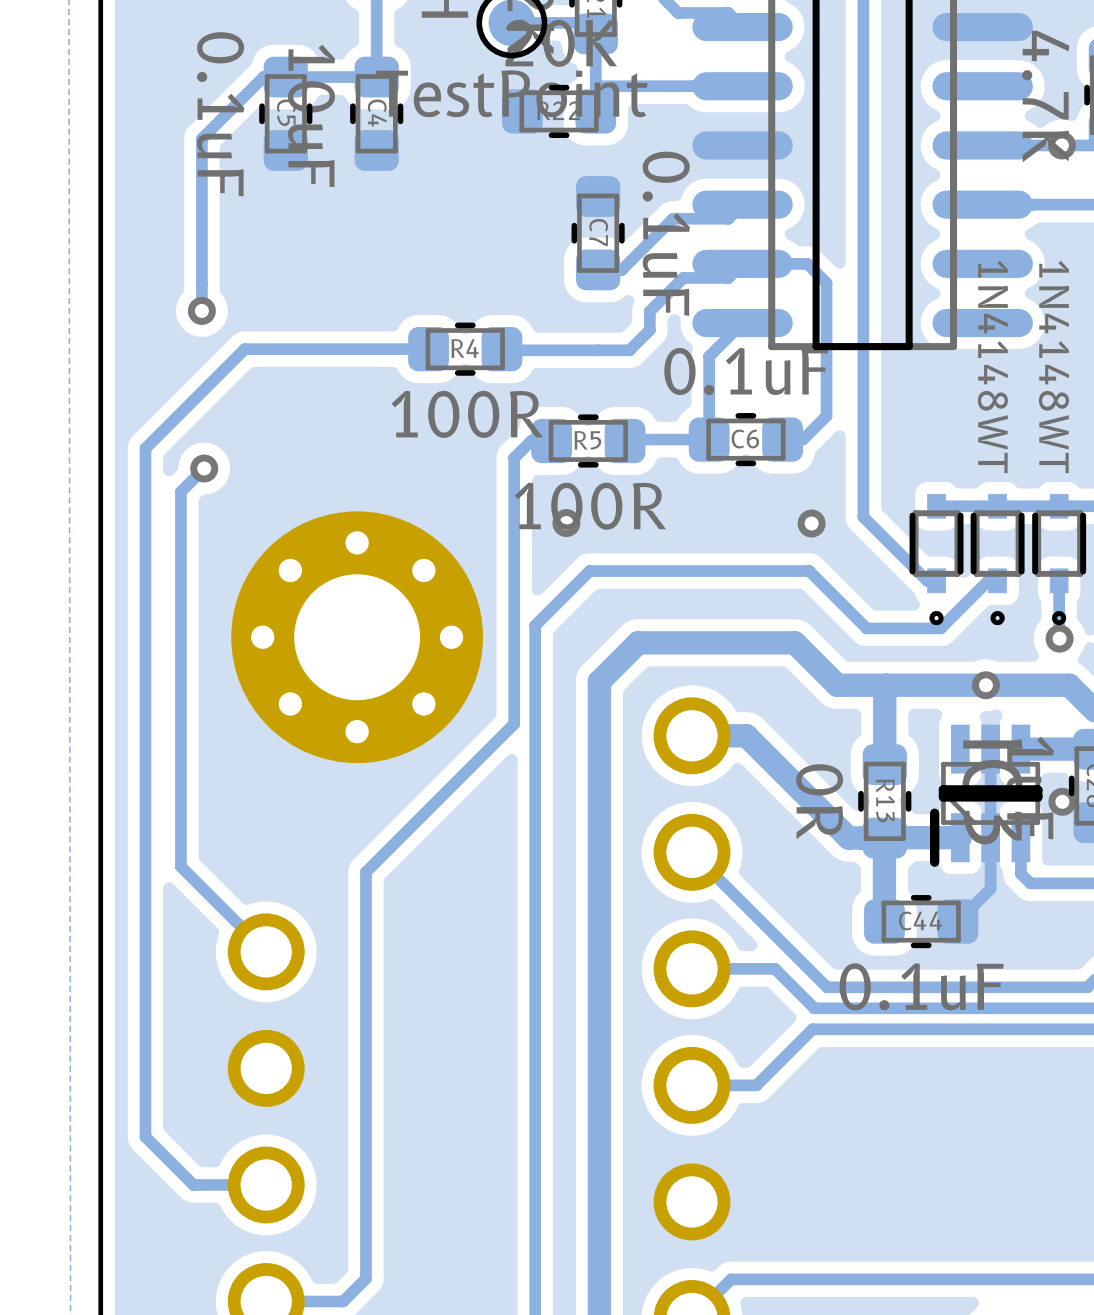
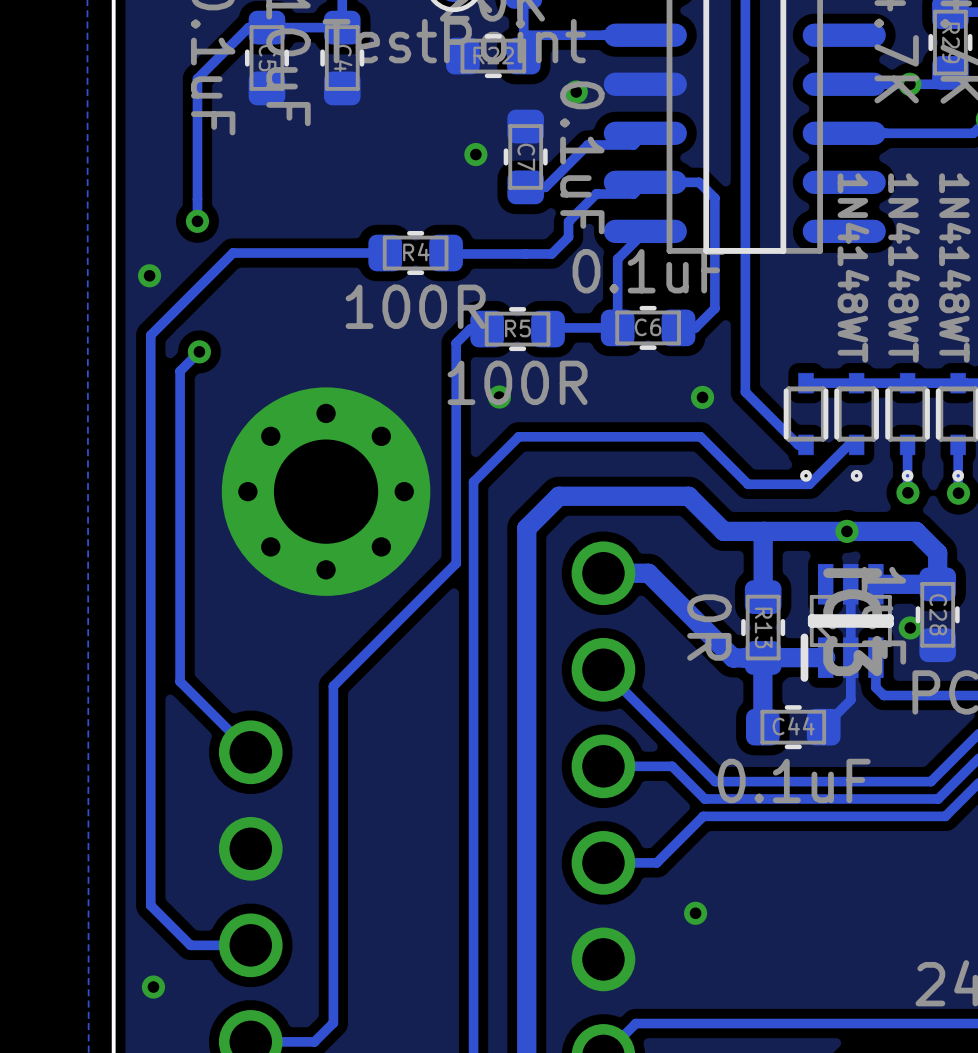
via: none -> (576, 91)
via: none -> (475, 154)
via: none -> (149, 275)
via: none -> (695, 913)
via: none -> (153, 987)

